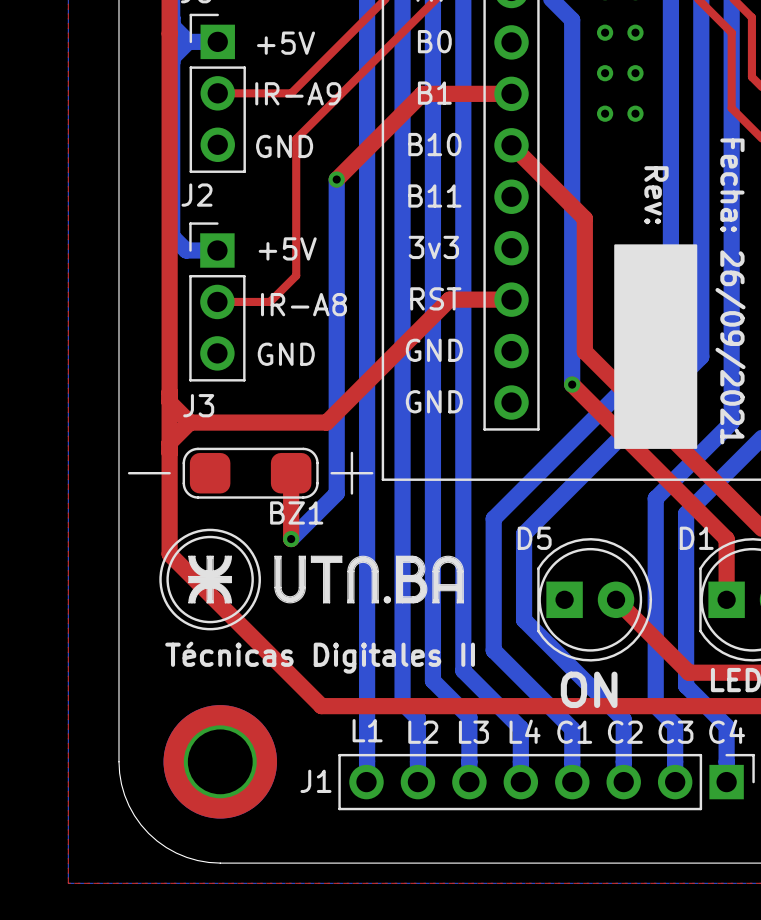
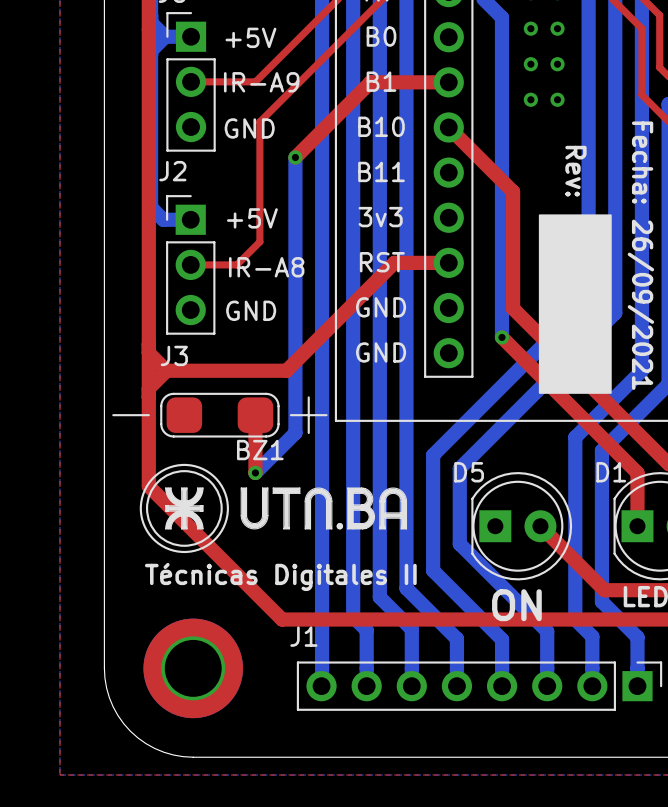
text: L1 (367, 730) -> none
text: L4 (525, 731) -> none
text: C4 (727, 731) -> none
text: L2 (423, 732) -> none
text: L3 (473, 732) -> none
text: C1 (574, 732) -> none
text: C2 (625, 732) -> none
text: C3 (675, 732) -> none
J1 name position: J1 (315, 781) -> J1 (303, 636)

